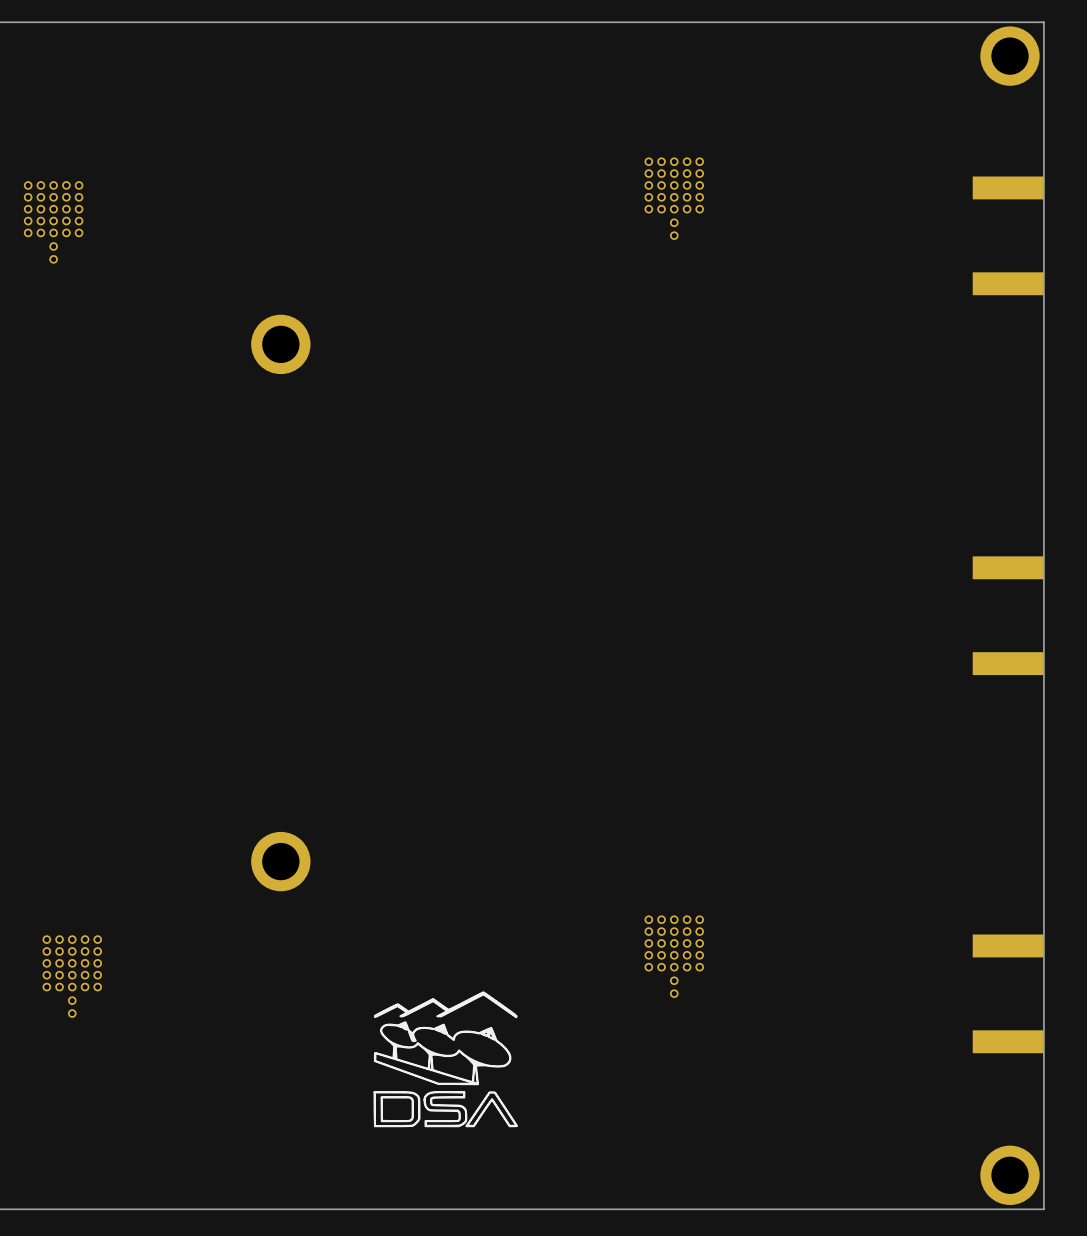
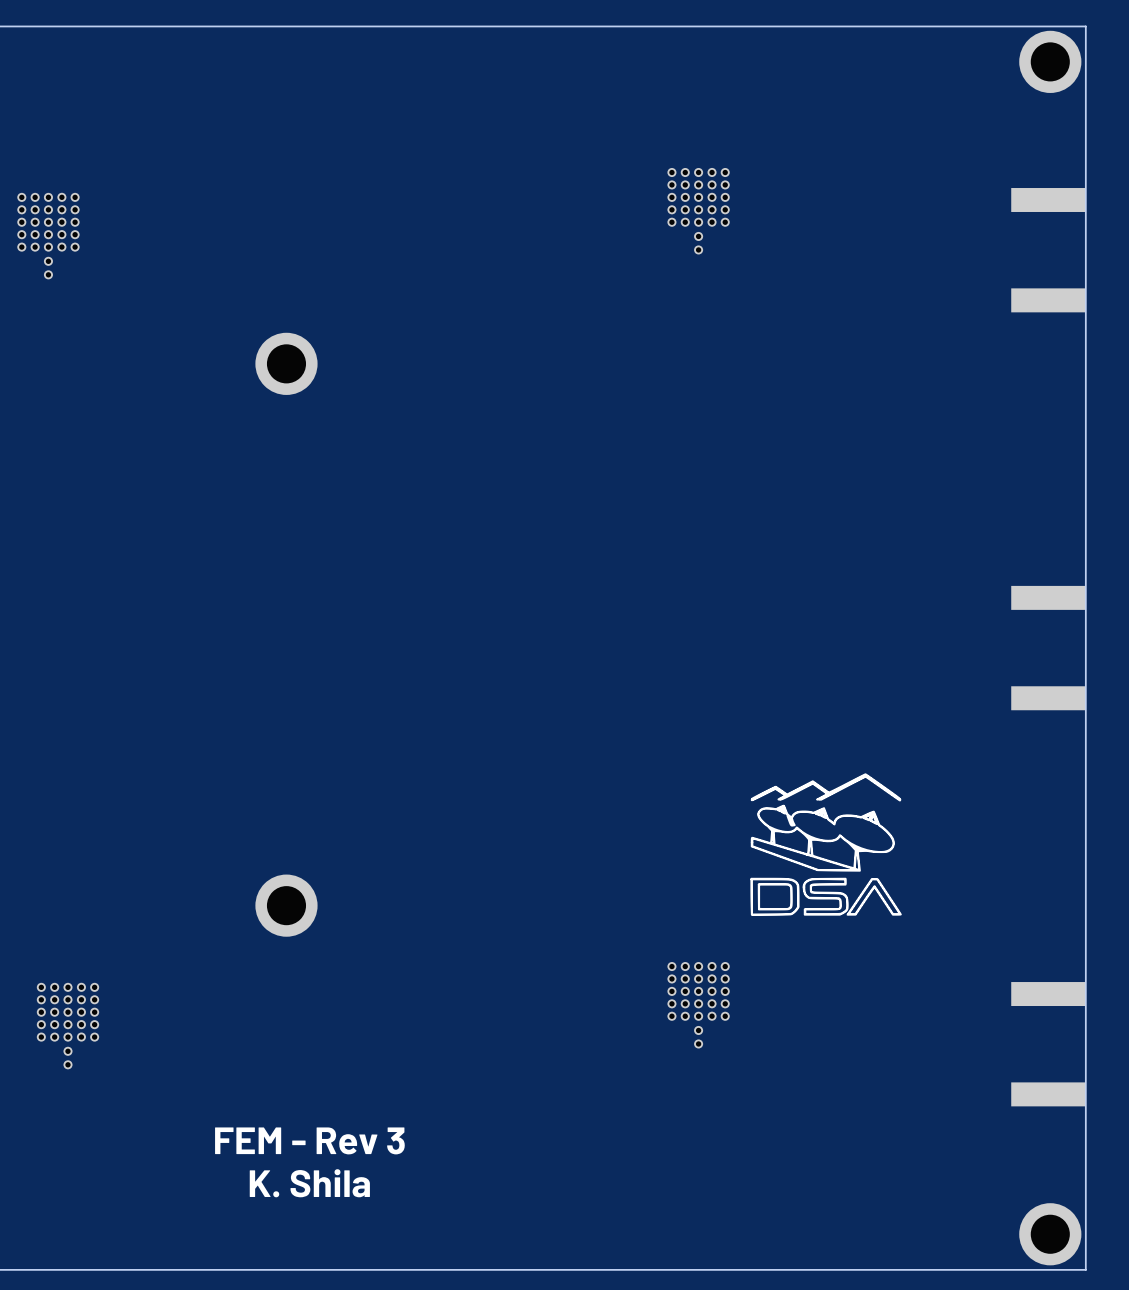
drawing: none -> [750, 773, 902, 916]
drawing: [373, 991, 519, 1128] -> none
text: none -> FEM - Rev 3 (309, 1140)
text: none -> K. Shila (309, 1183)

